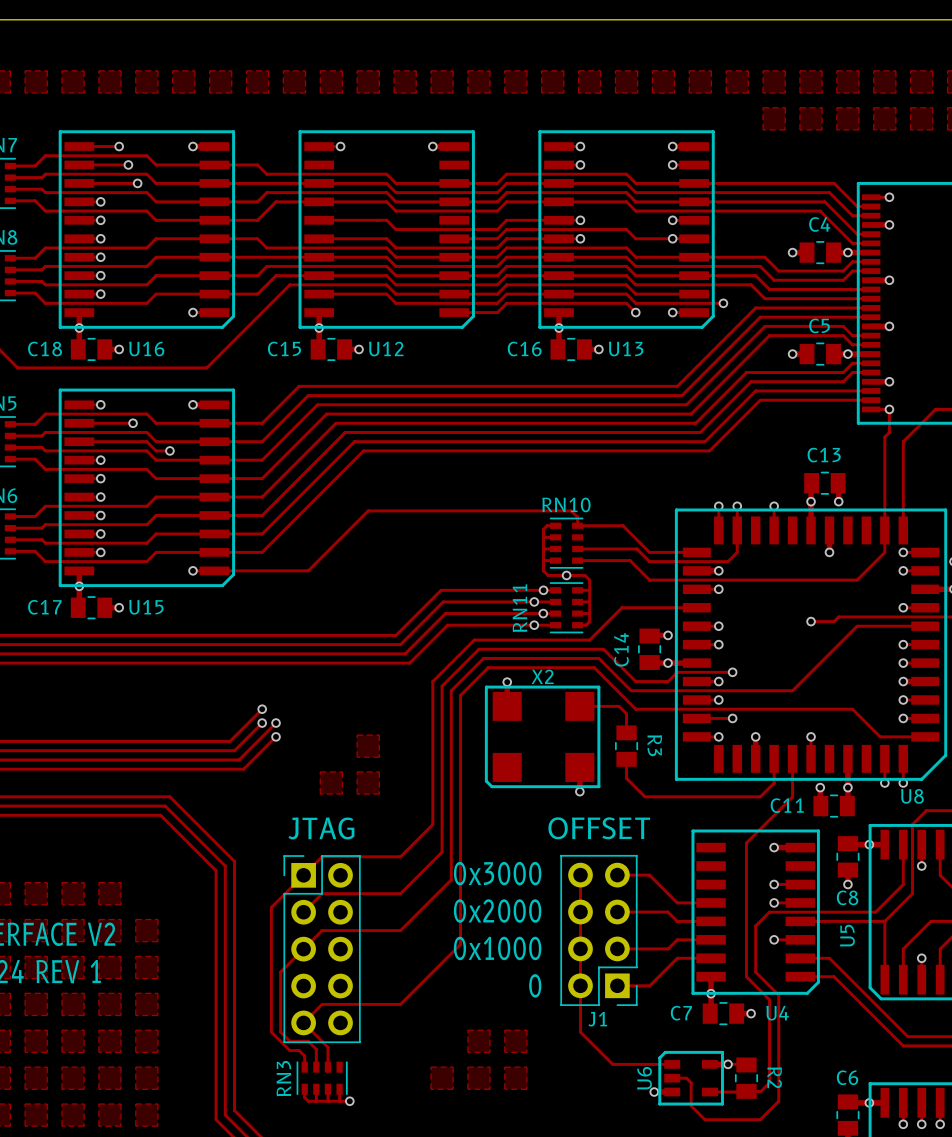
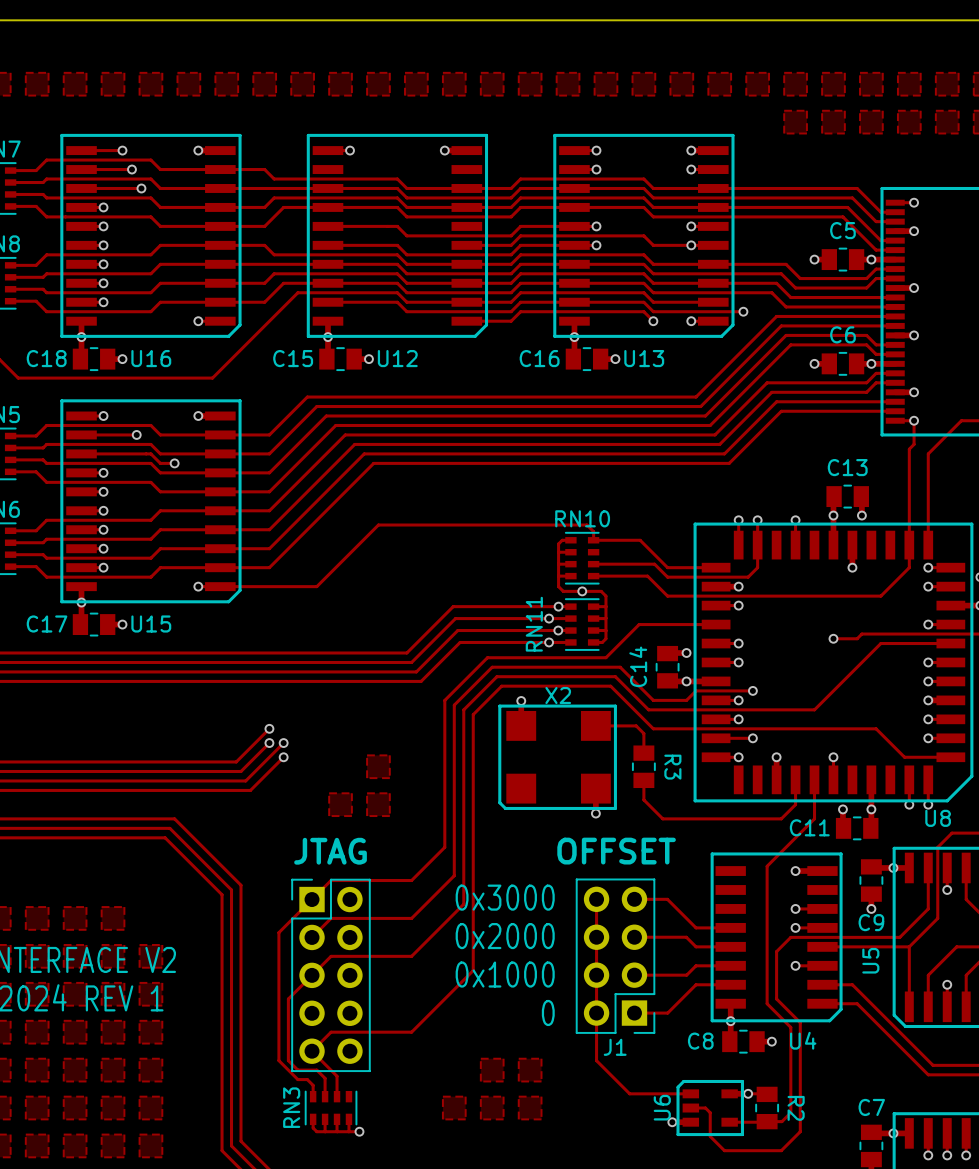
C4 name: C4 (819, 224) -> C5 (842, 230)
C5 name: C5 (819, 325) -> C6 (842, 334)
C8 name: C8 (847, 897) -> C9 (871, 922)
C7 name: C7 (681, 1013) -> C8 (700, 1041)
C6 name: C6 (847, 1077) -> C7 (871, 1107)

